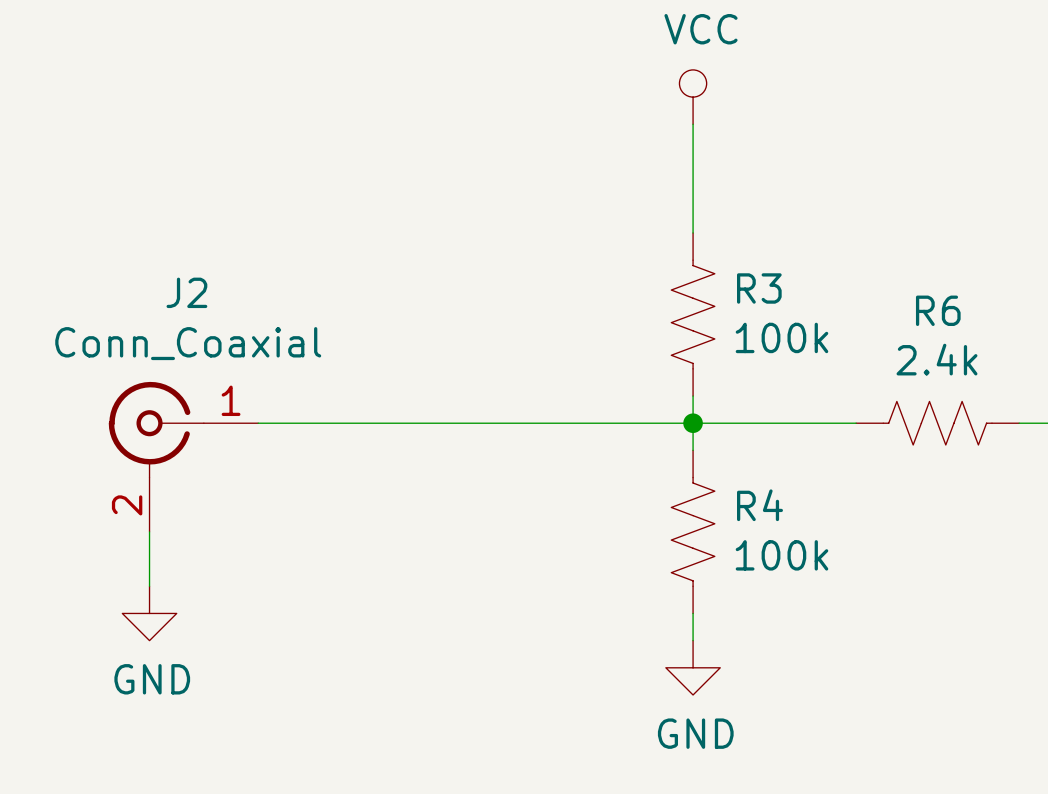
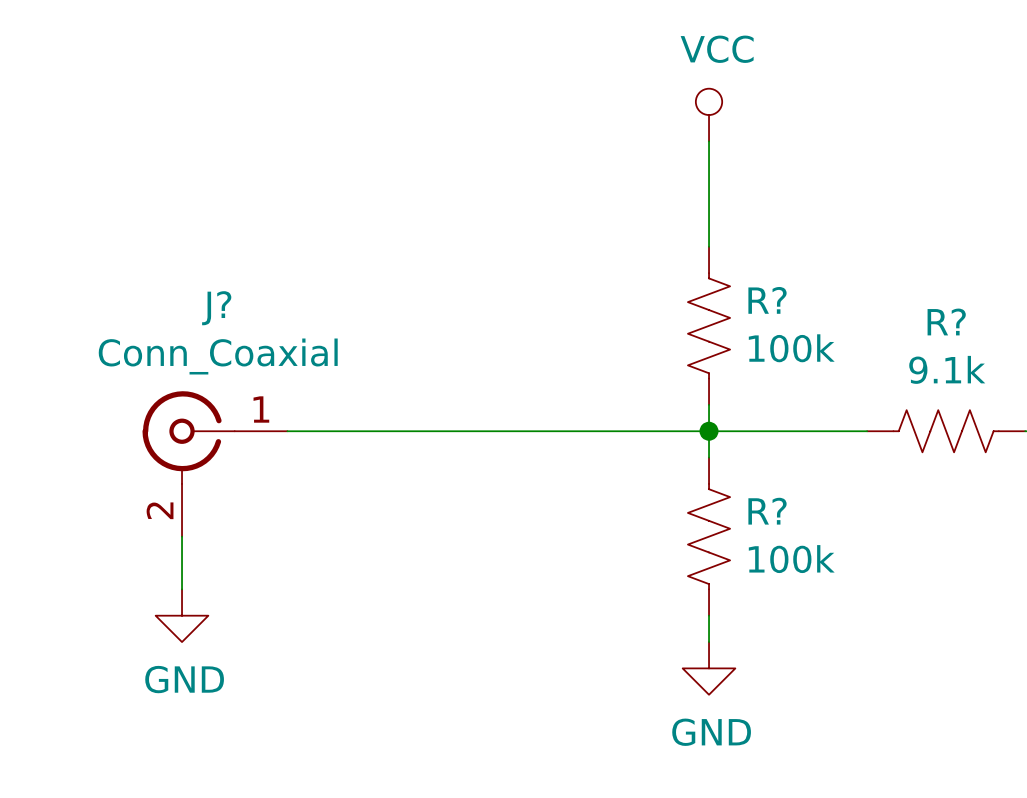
R3 name: R3 (759, 288) -> R? (767, 300)
J2 name: J2 (186, 292) -> J? (216, 308)
R6 name: R6 (938, 310) -> R? (946, 321)
R6 value: 2.4k (936, 359) -> 9.1k (947, 369)
R4 name: R4 (759, 505) -> R? (767, 511)

